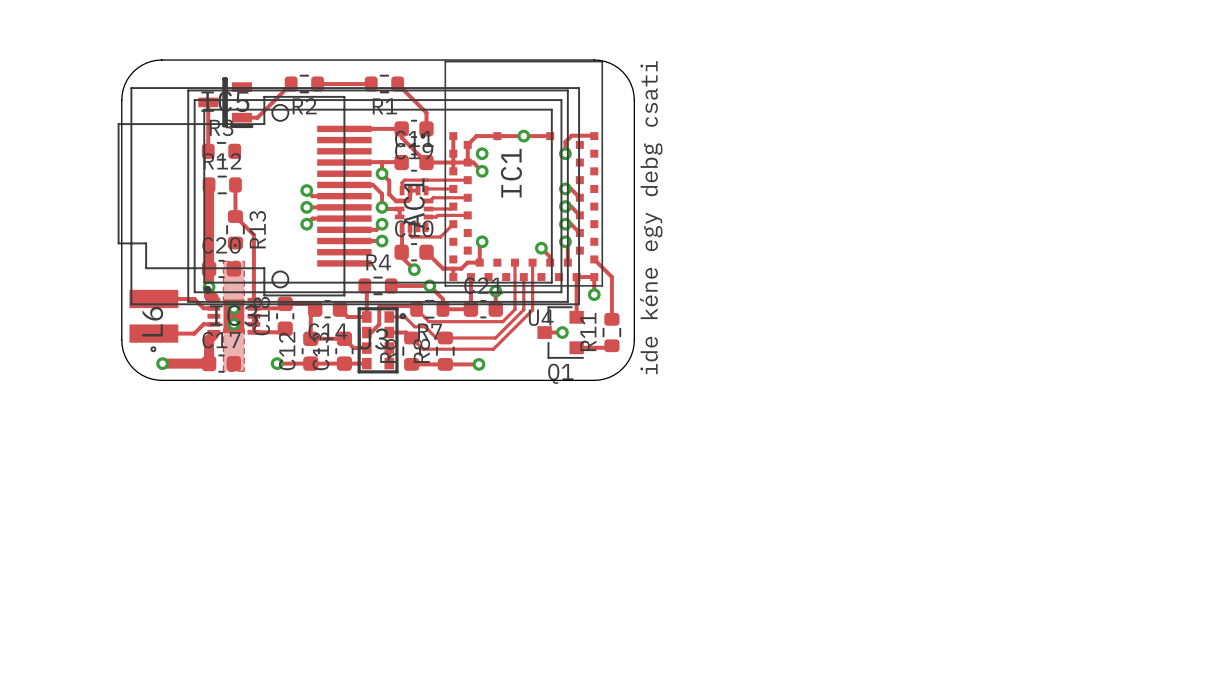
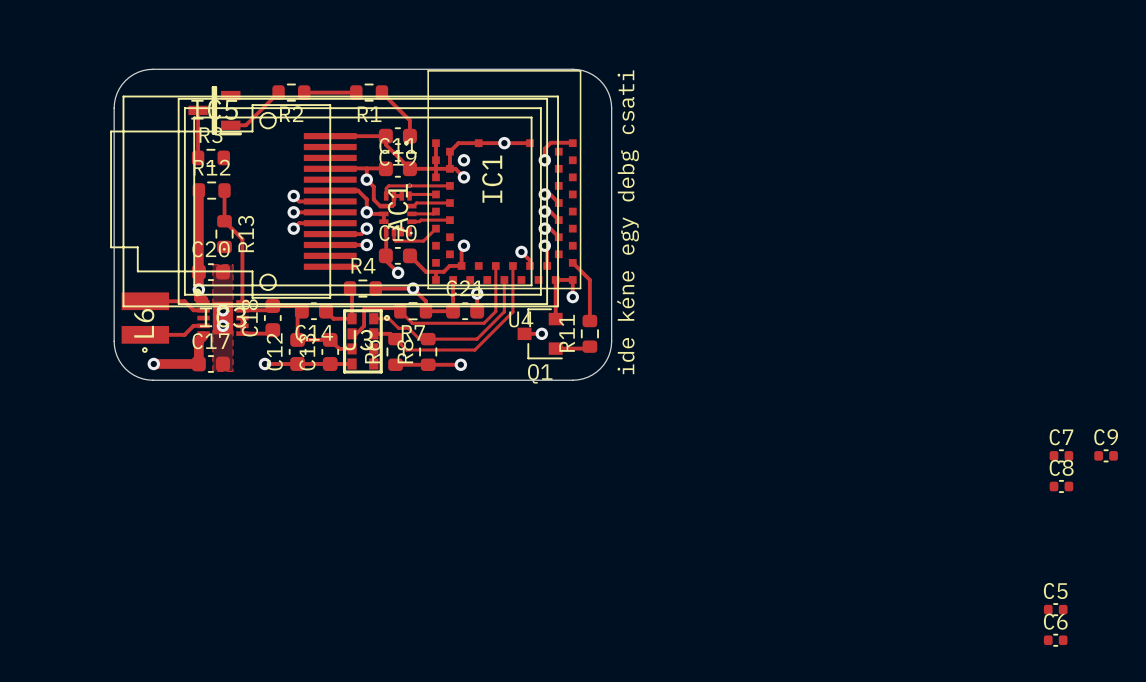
C7: none -> (1061, 455)
C9: none -> (1106, 455)
C8: none -> (1061, 486)
C5: none -> (1055, 609)
C6: none -> (1055, 640)

